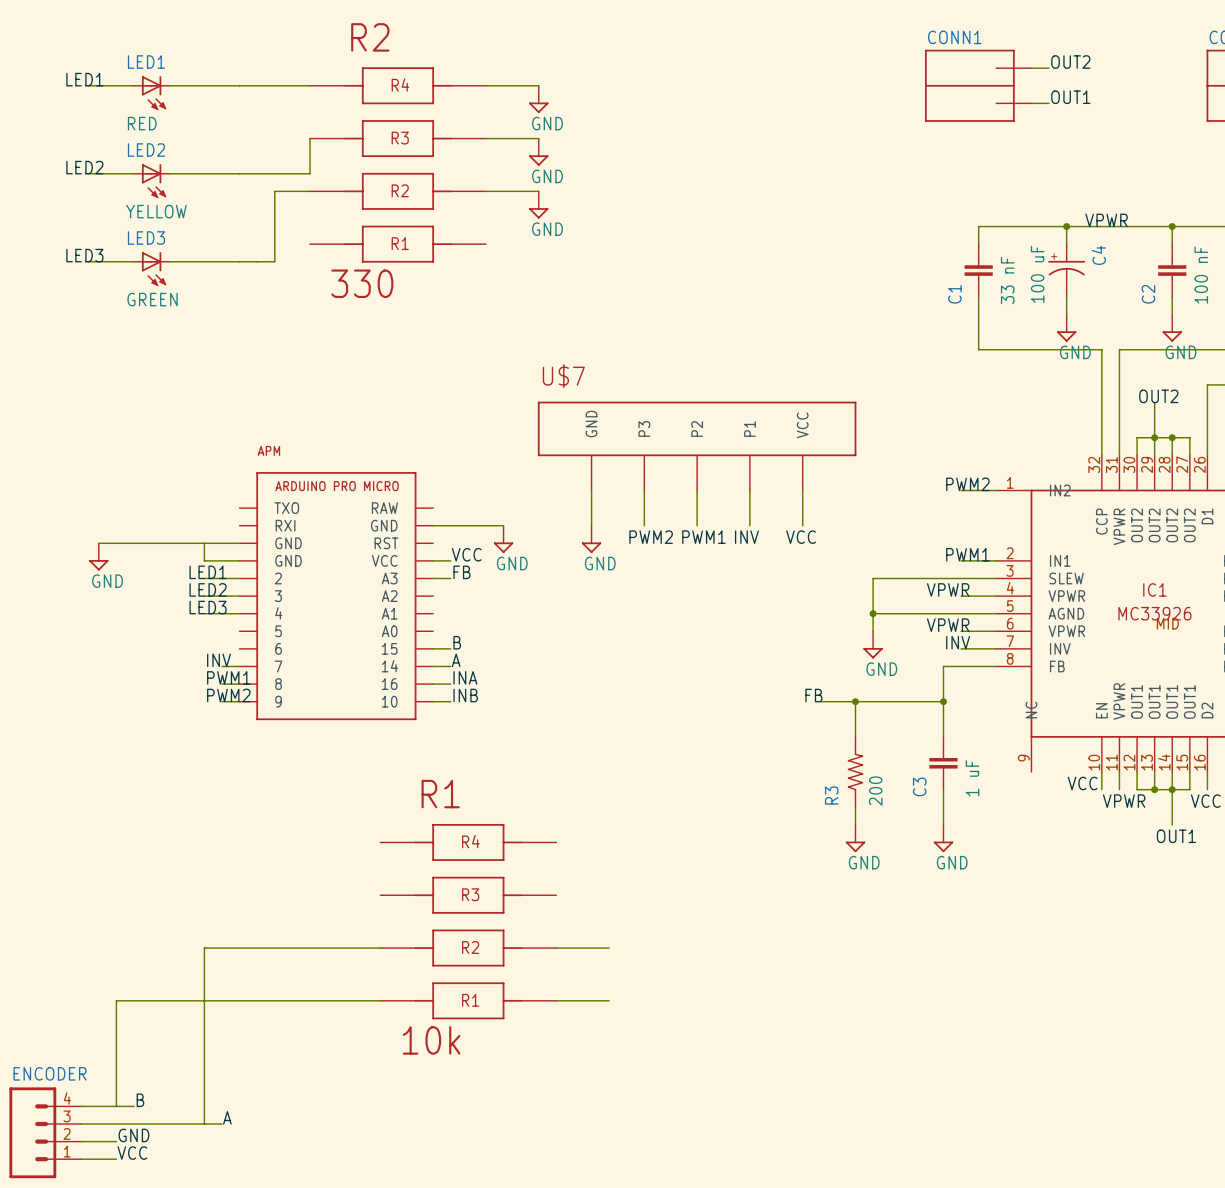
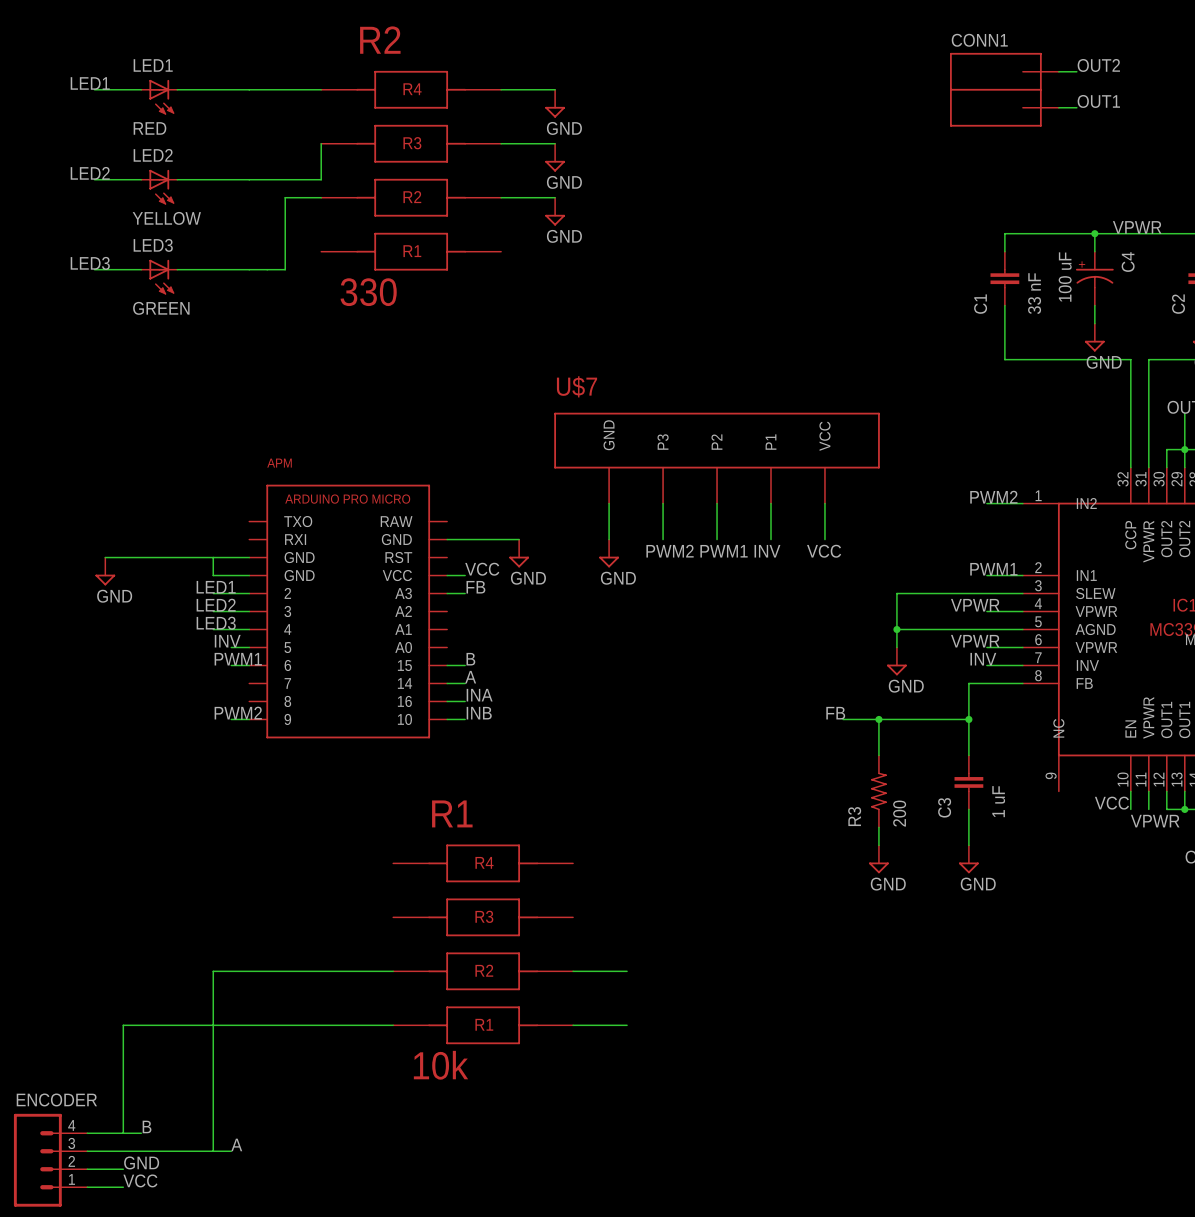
label position: INV (219, 660) -> INV (227, 641)
wire: (222, 666) (239, 666) -> (231, 647) (249, 647)
label position: PWM1 (228, 677) -> PWM1 (238, 659)
wire: (222, 684) (239, 684) -> (231, 665) (249, 665)

